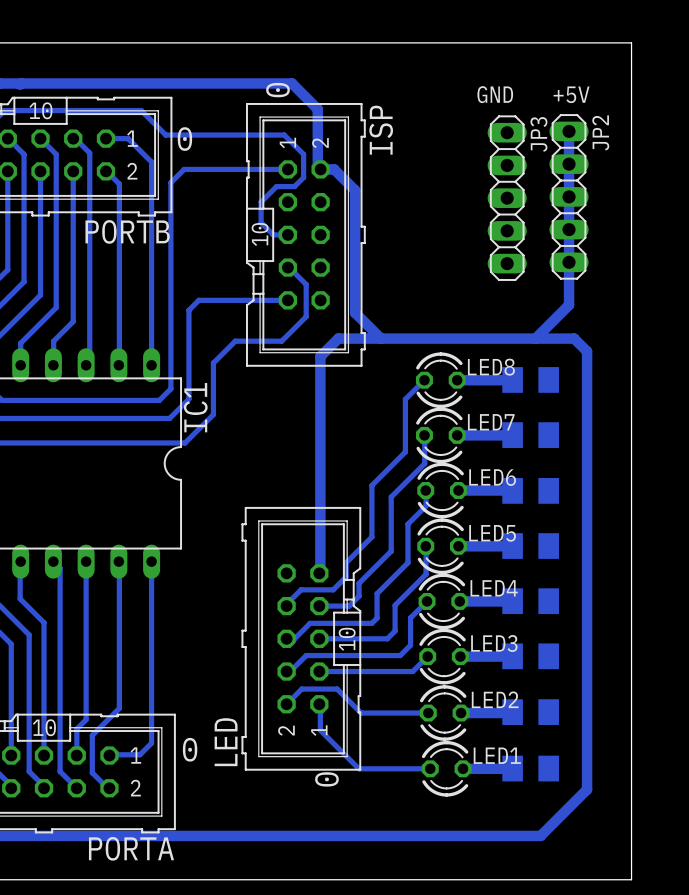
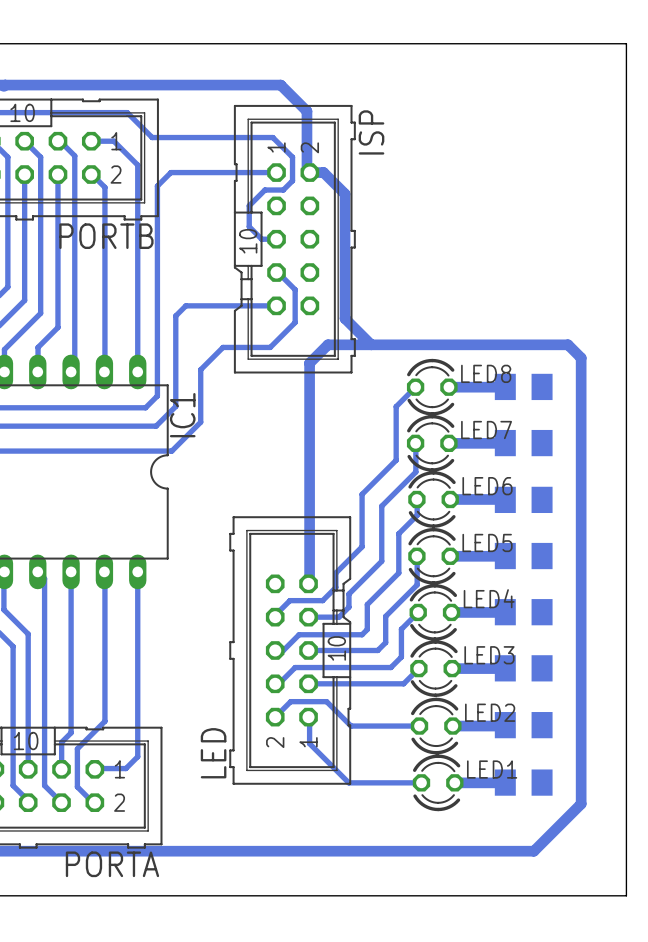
text: 0 (277, 90) -> none
text: GND (495, 94) -> none
text: +5V (571, 94) -> none
bottom track: (569, 131) (569, 305) (535, 338) -> none
text: 0 (184, 139) -> none
JP2: (569, 196) -> none
JP3: (507, 198) -> none
text: 0 (190, 749) -> none
text: 0 (326, 779) -> none

